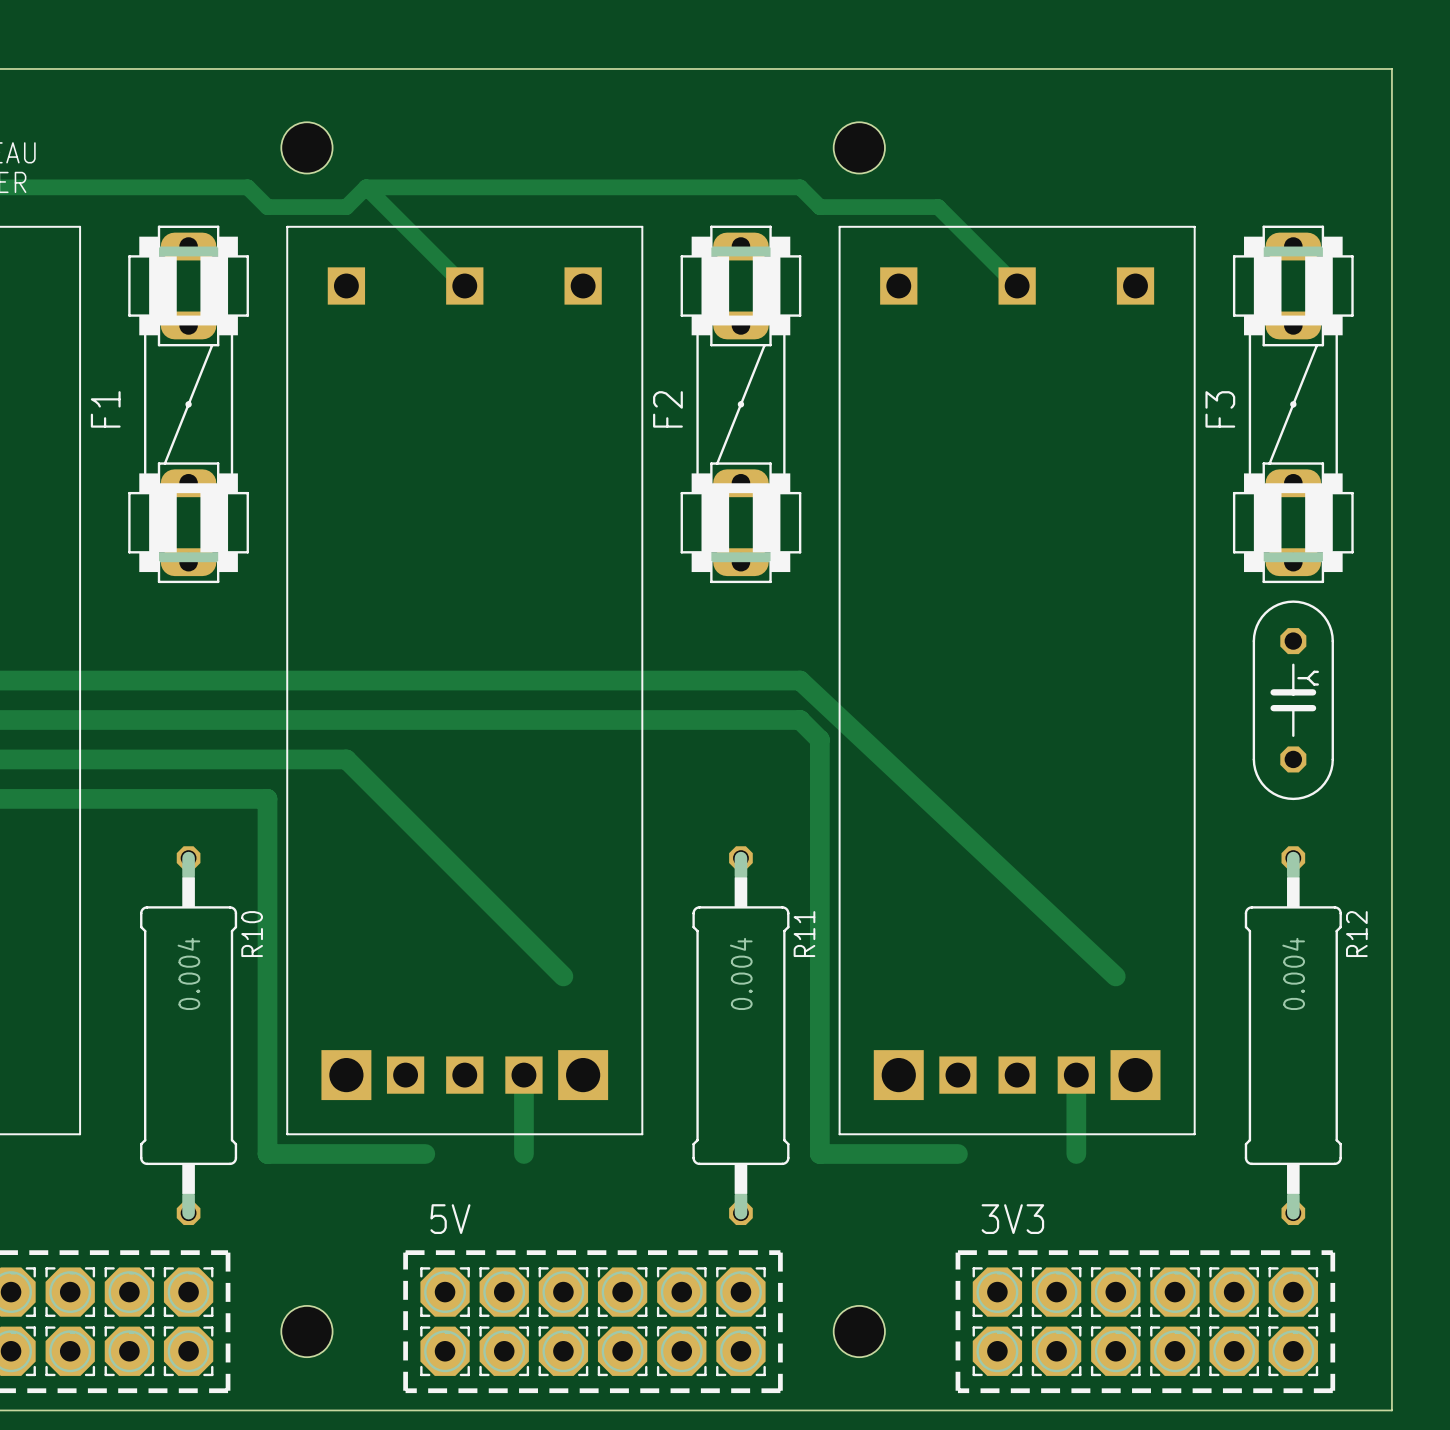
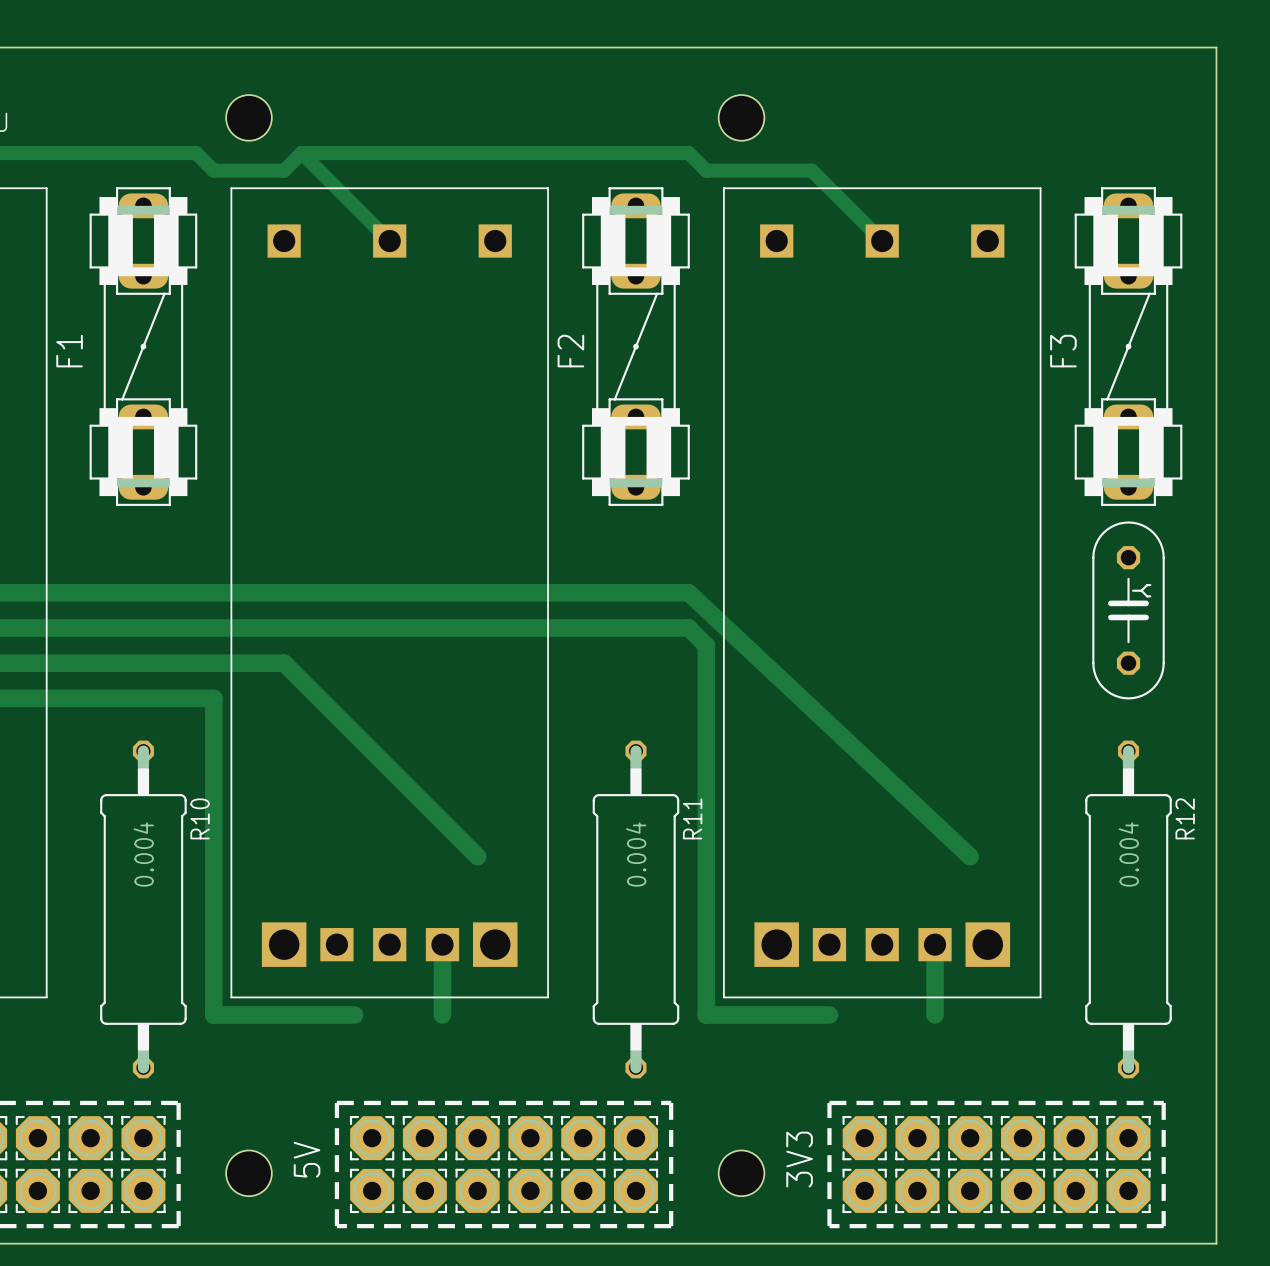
text rotation: 0° (450, 1219) -> 90° counterclockwise (307, 1159)
text position: 5V (450, 1219) -> 5V (307, 1159)
text rotation: 0° (1012, 1219) -> 90° counterclockwise (799, 1159)
text position: 3V3 (1012, 1219) -> 3V3 (799, 1159)

